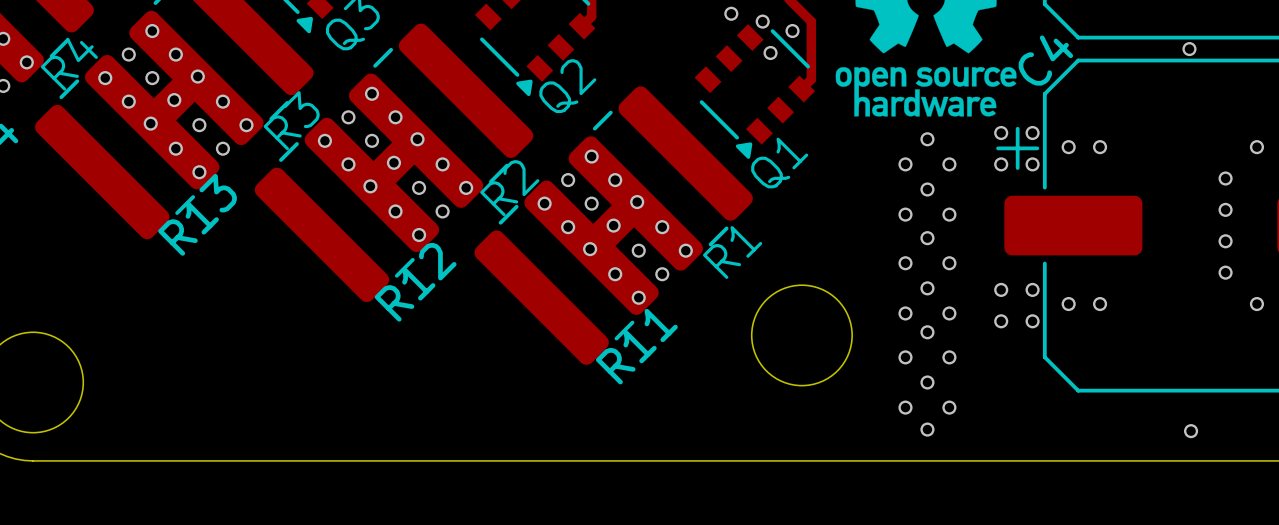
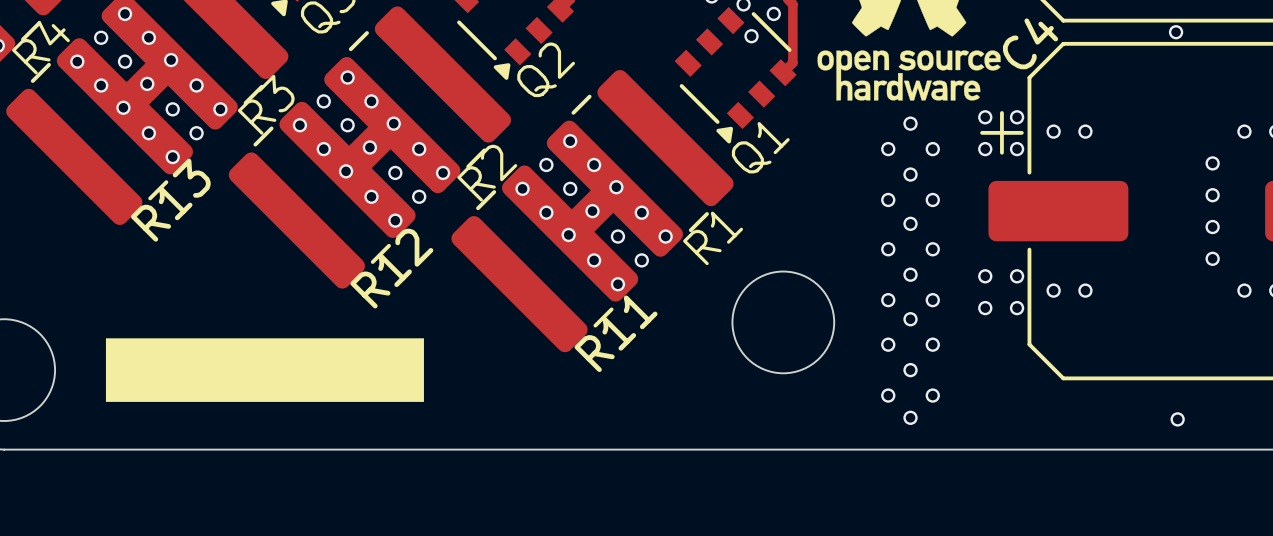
drawing: none -> [105, 338, 424, 402]

